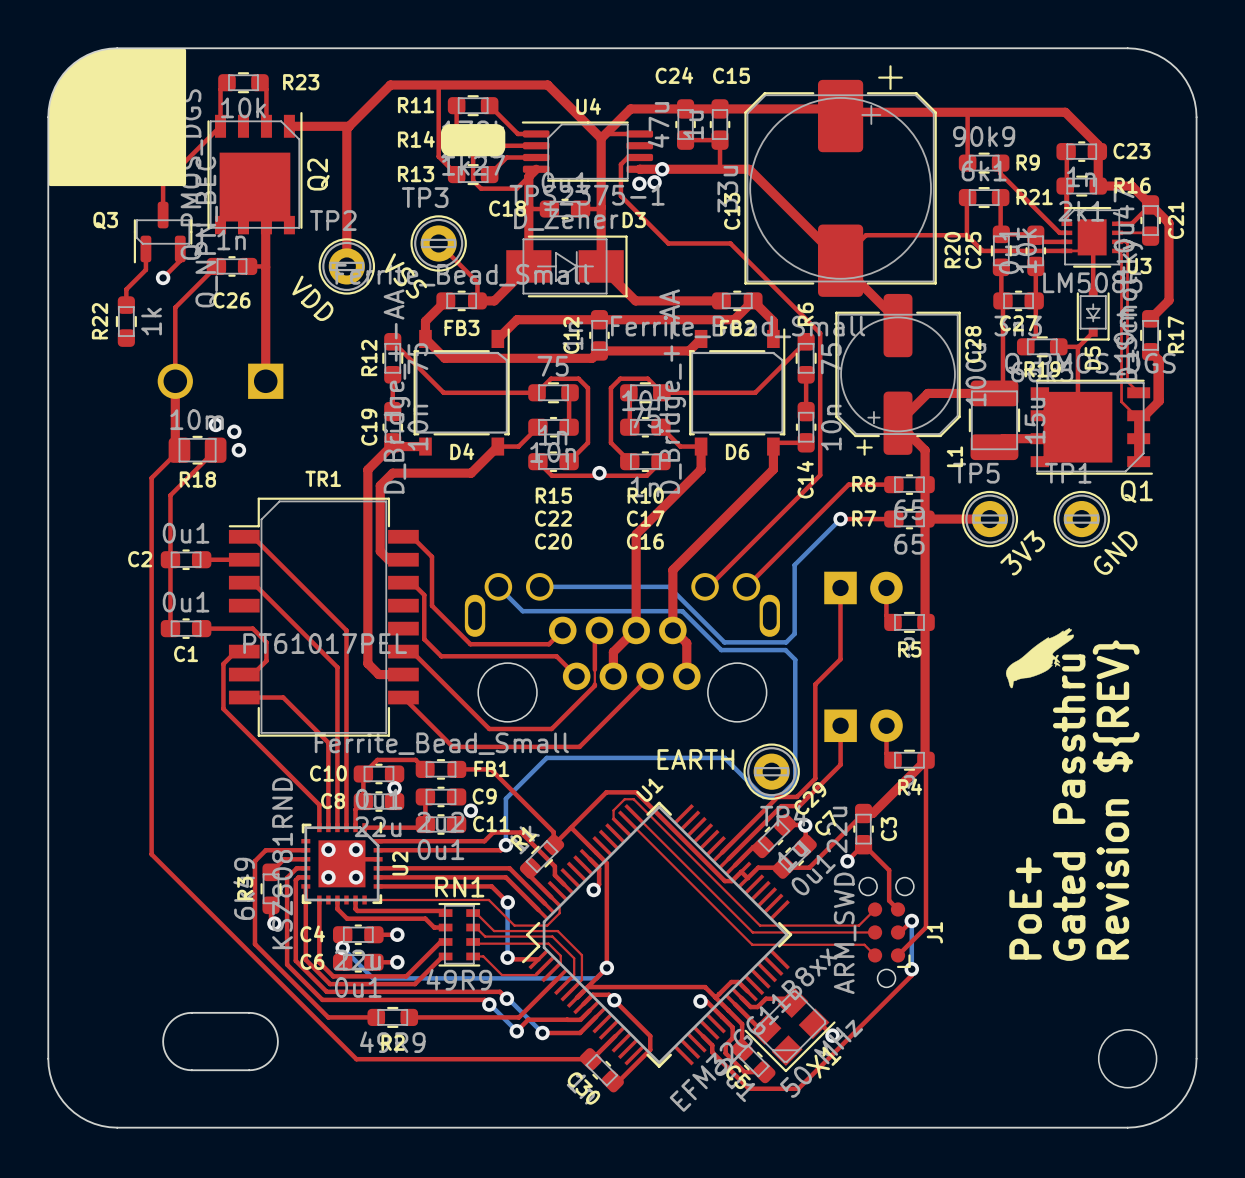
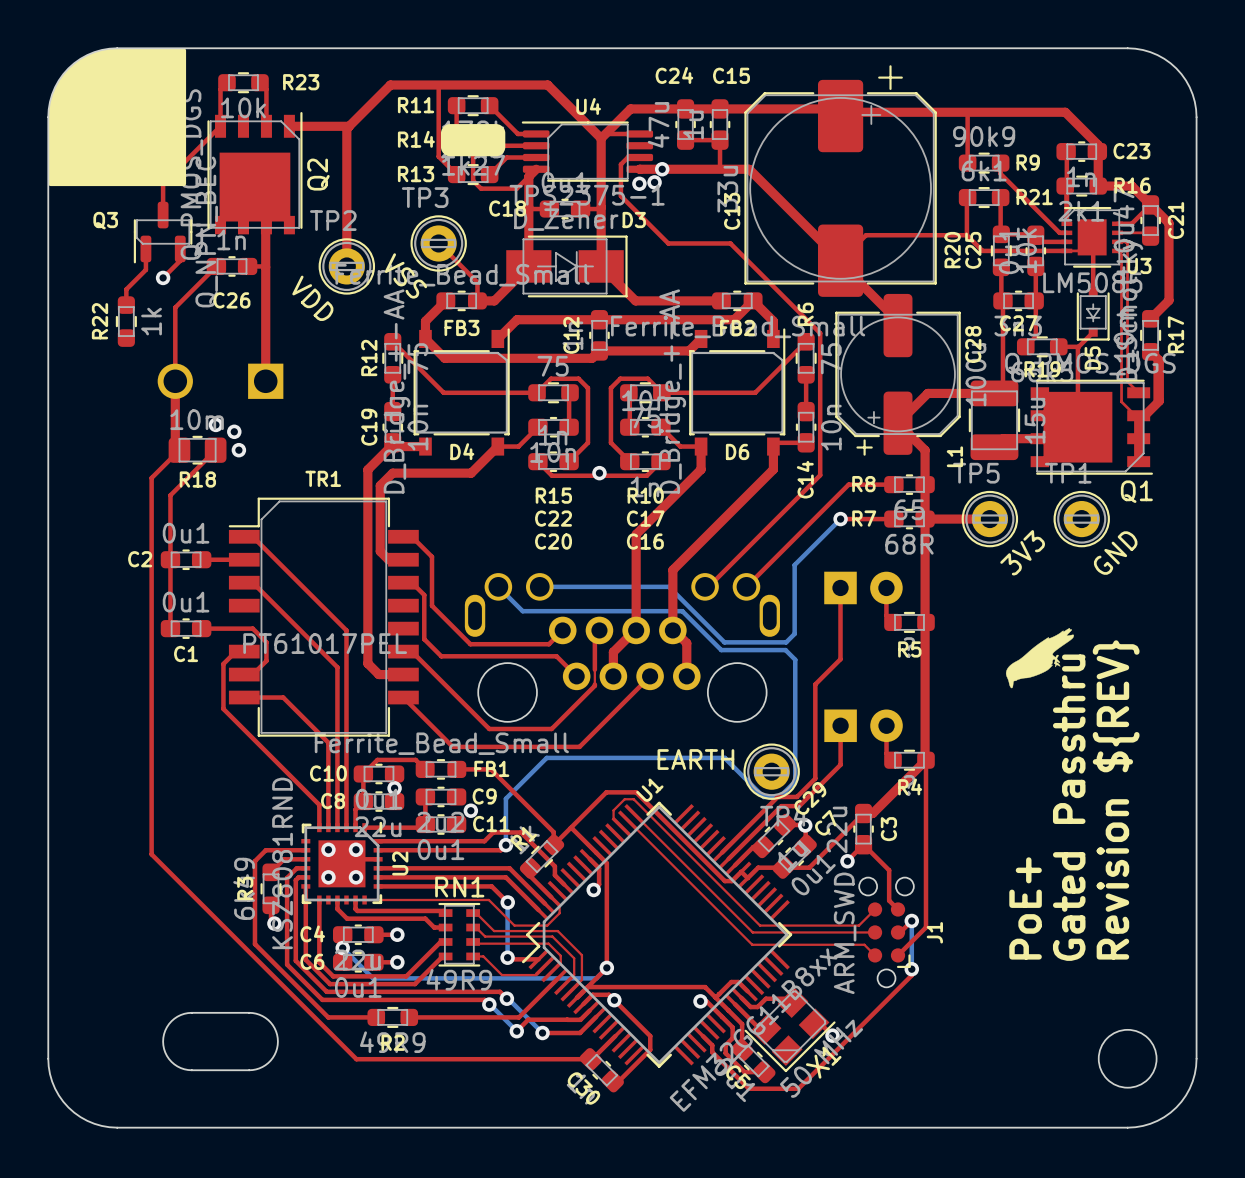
R7 value: 65 (909, 544) -> 68R (909, 544)

